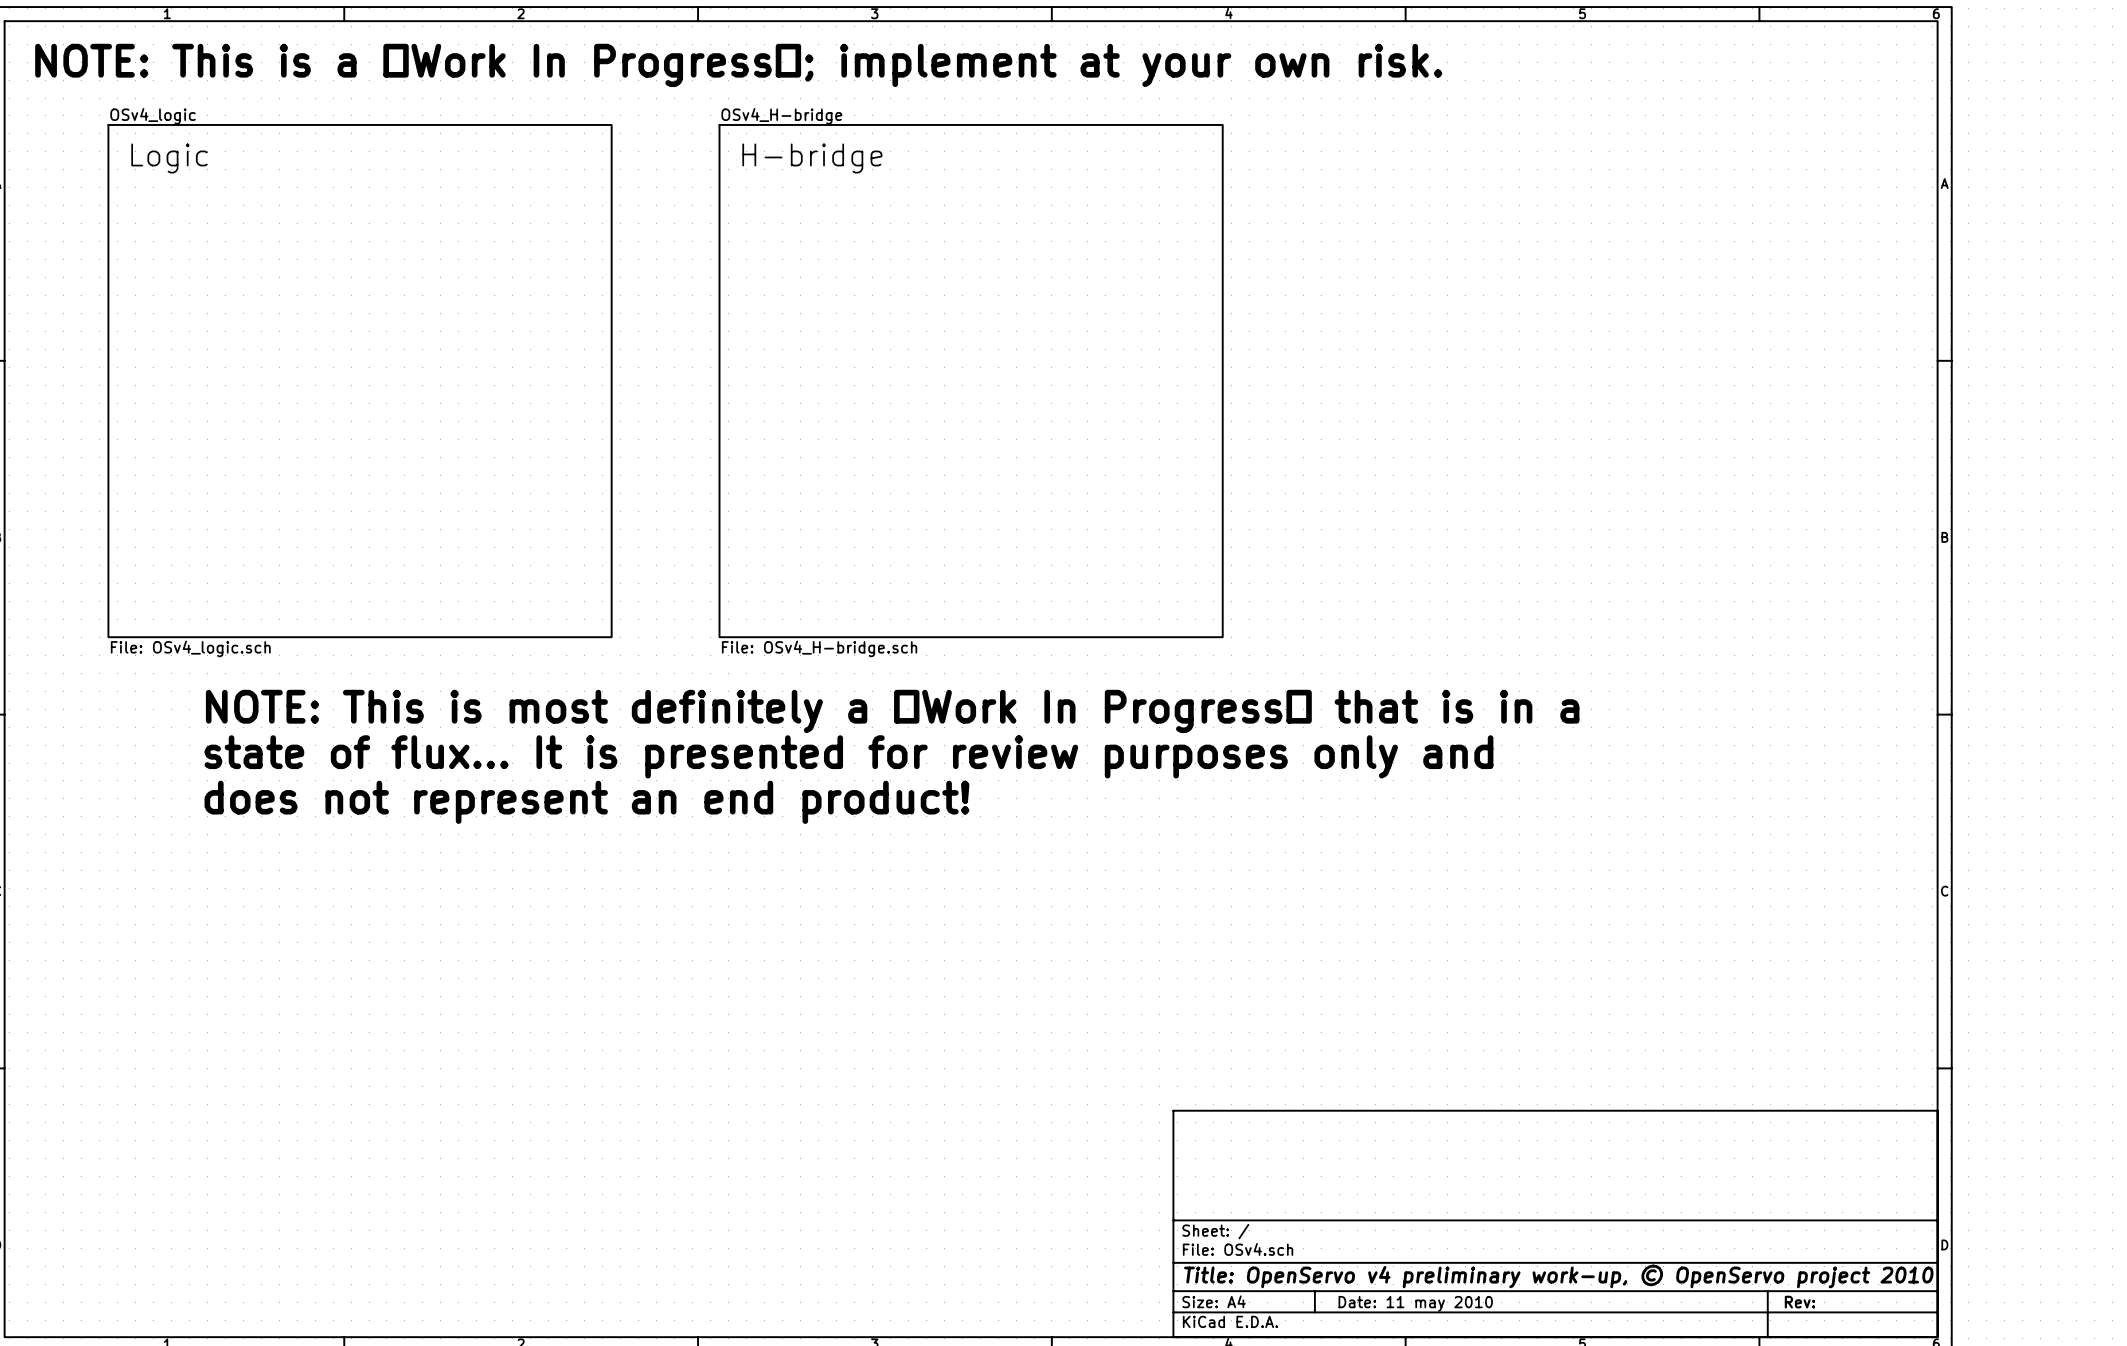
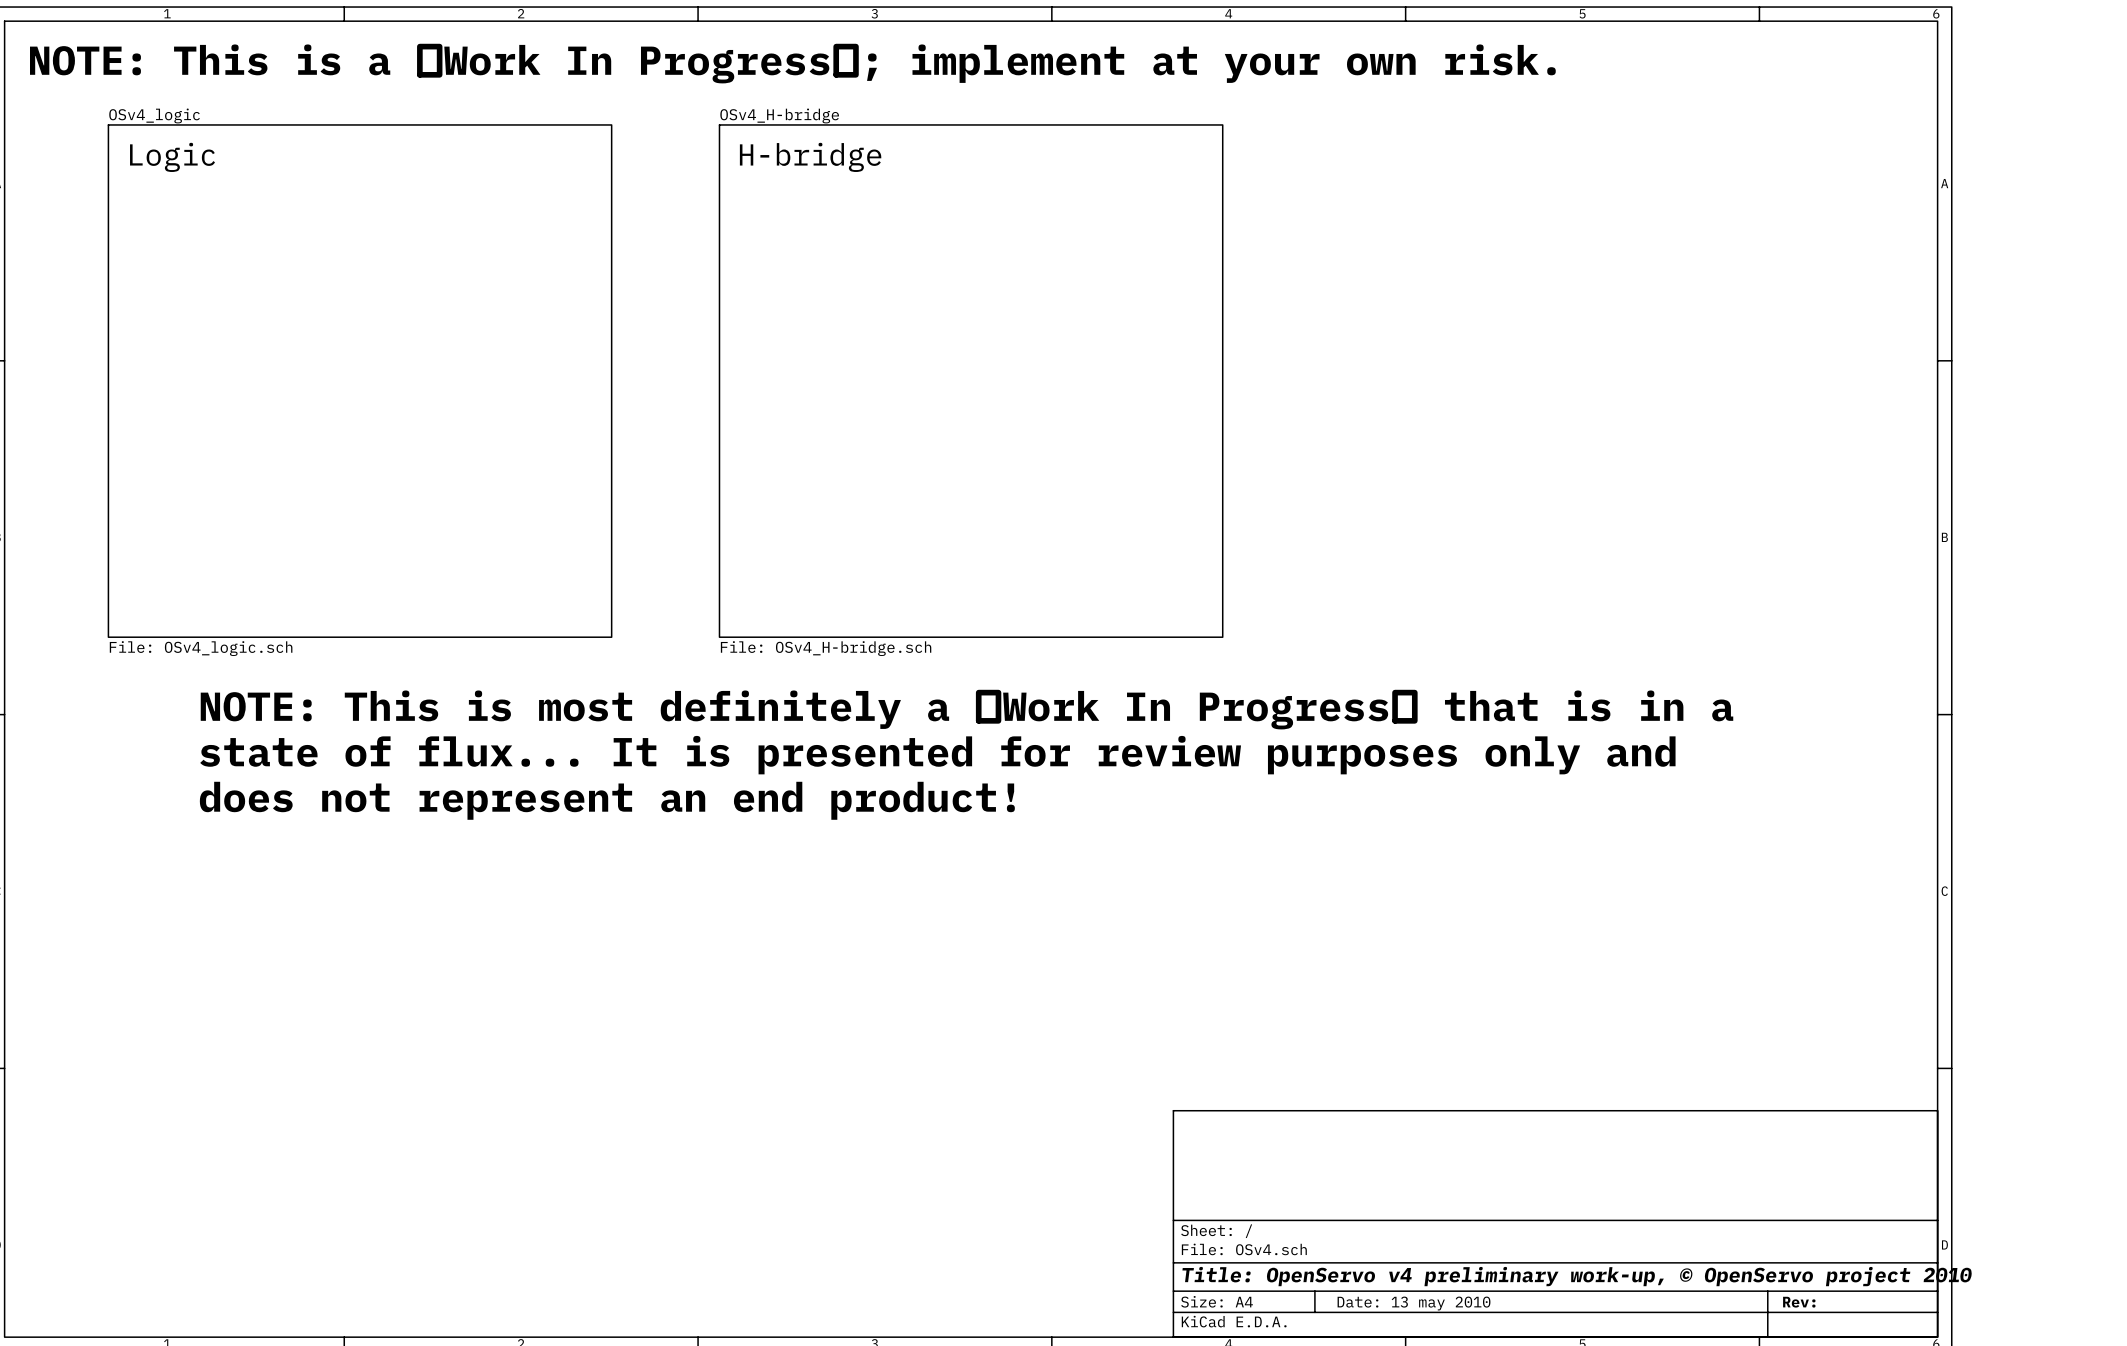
title block: Date: 11 may 2010 (1415, 1303) -> Date: 13 may 2010 (1414, 1303)

